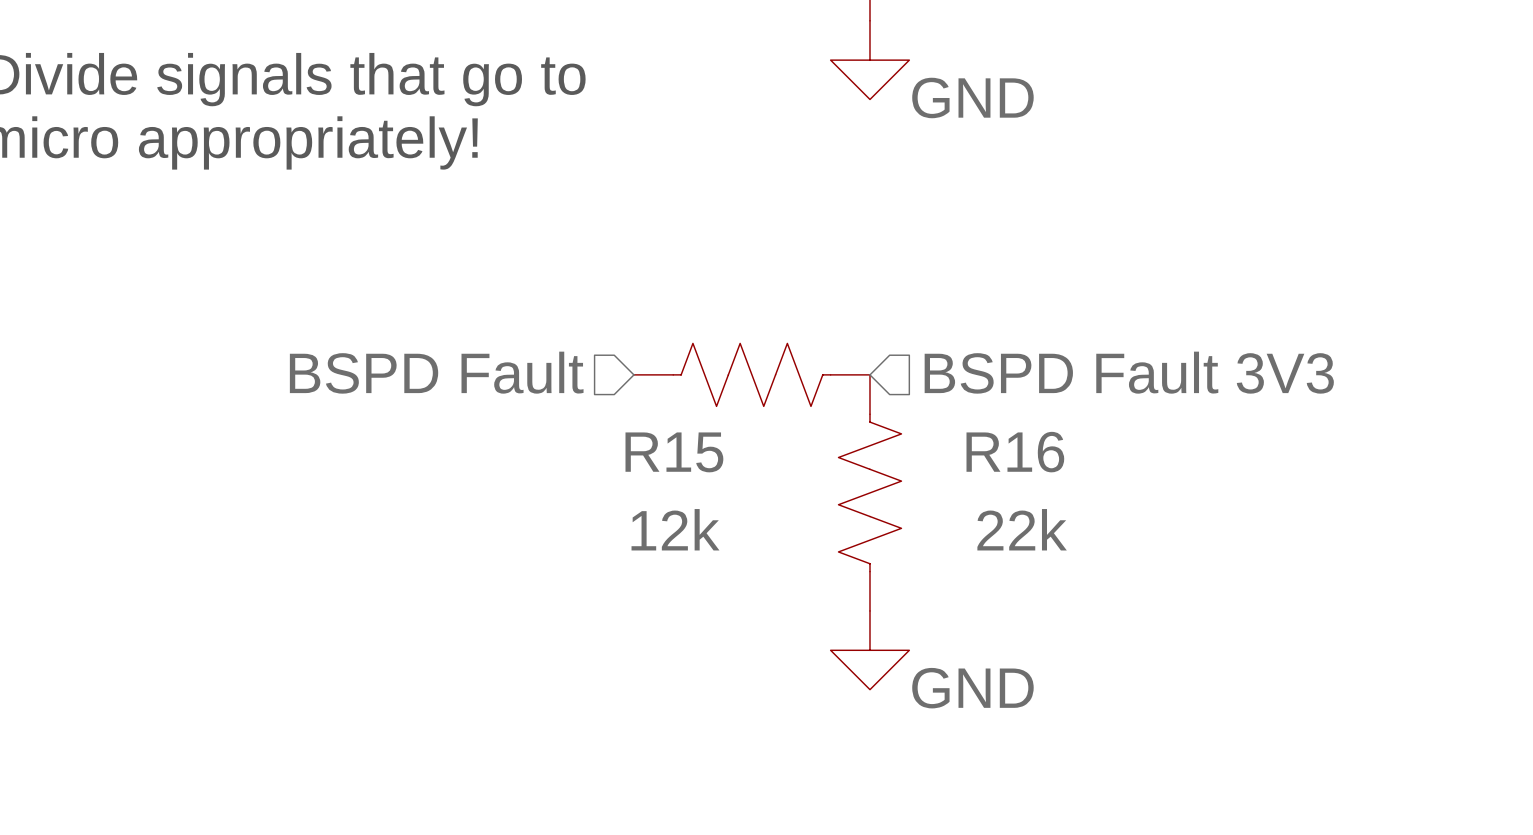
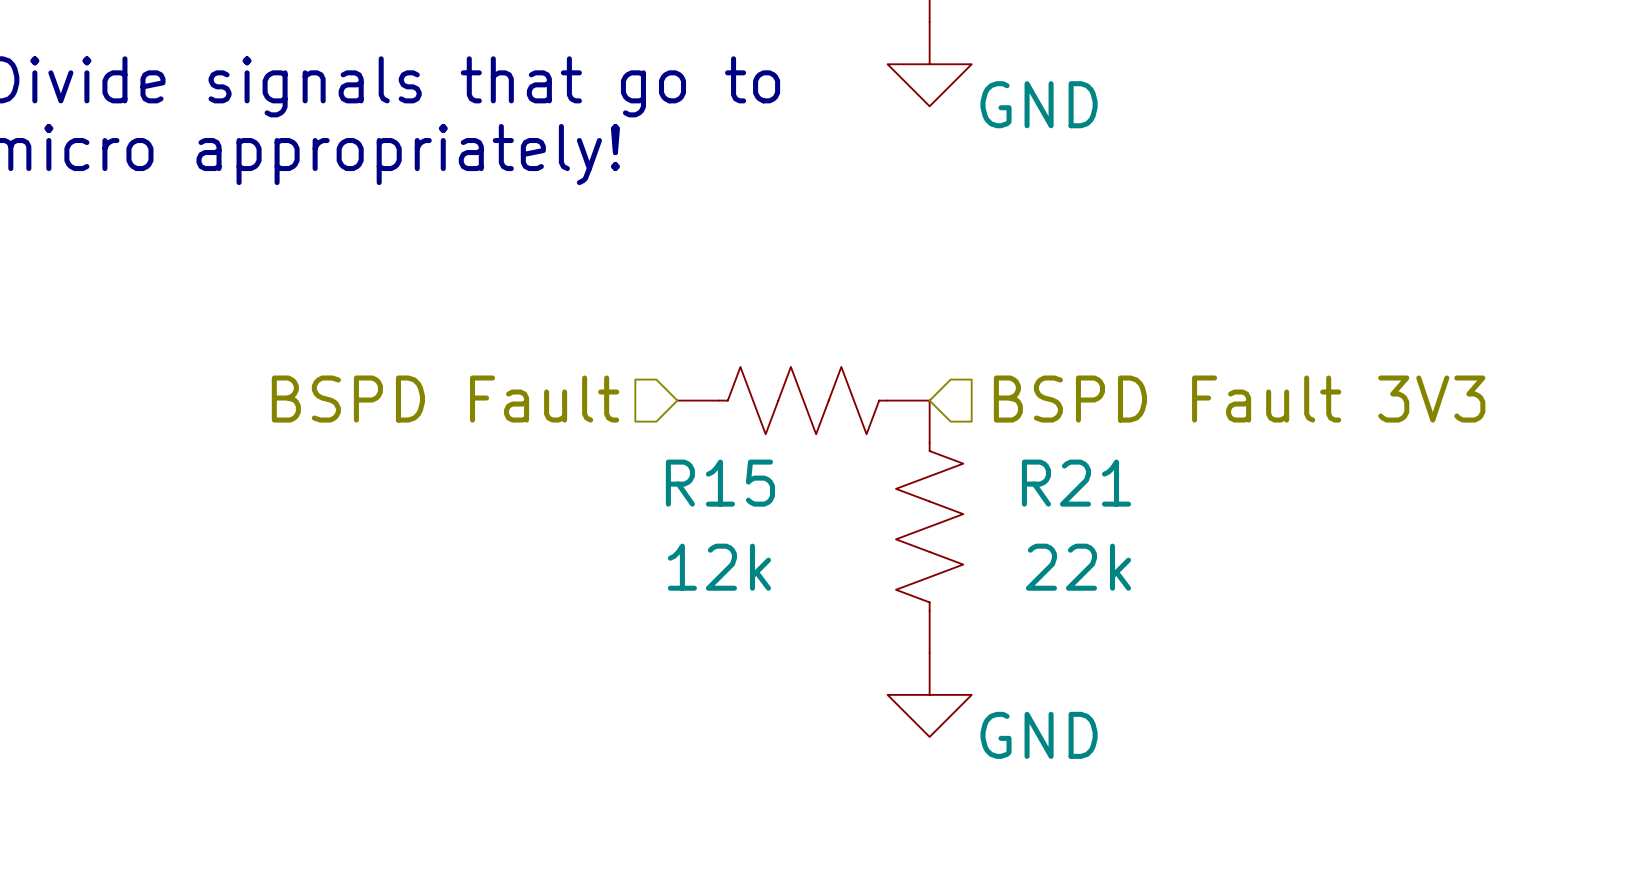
R16 name: R16 (1015, 452) -> R21 (1076, 483)

